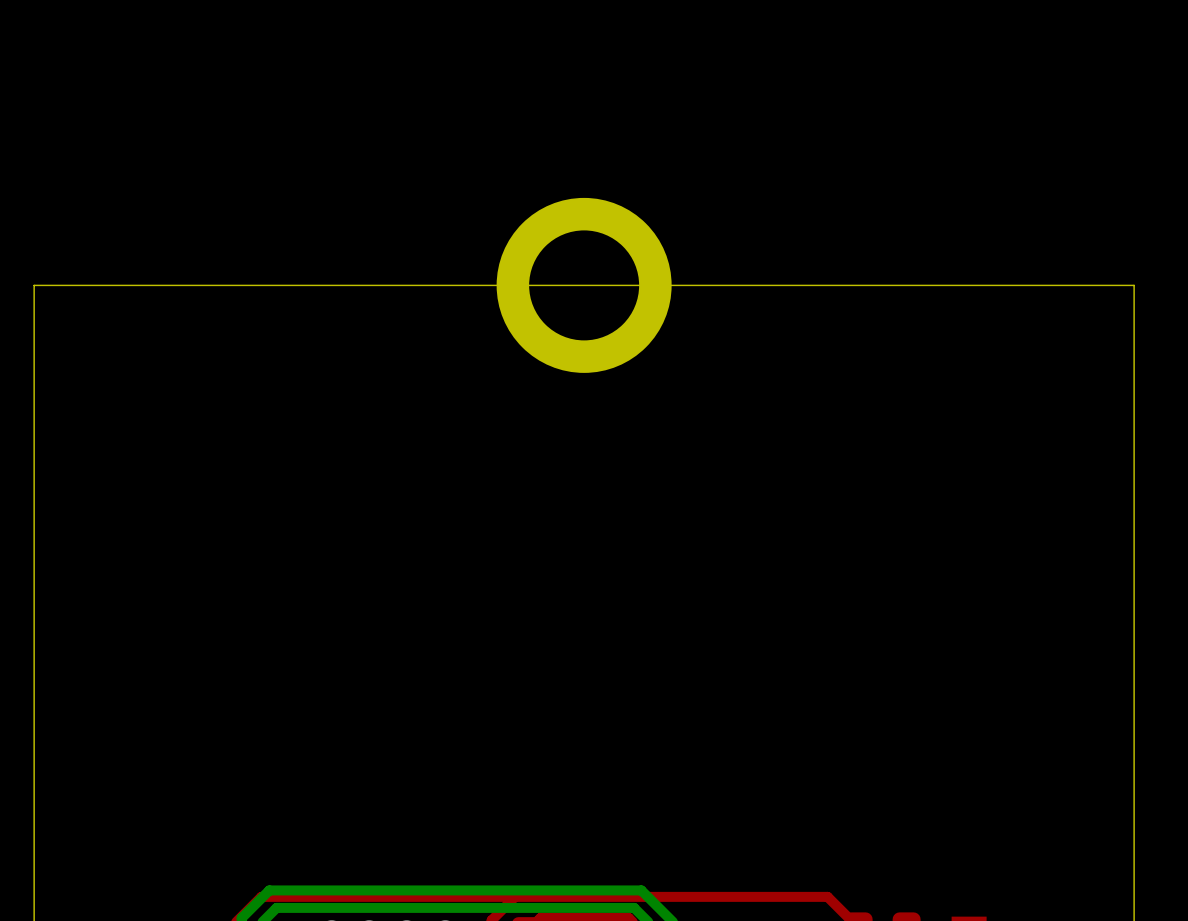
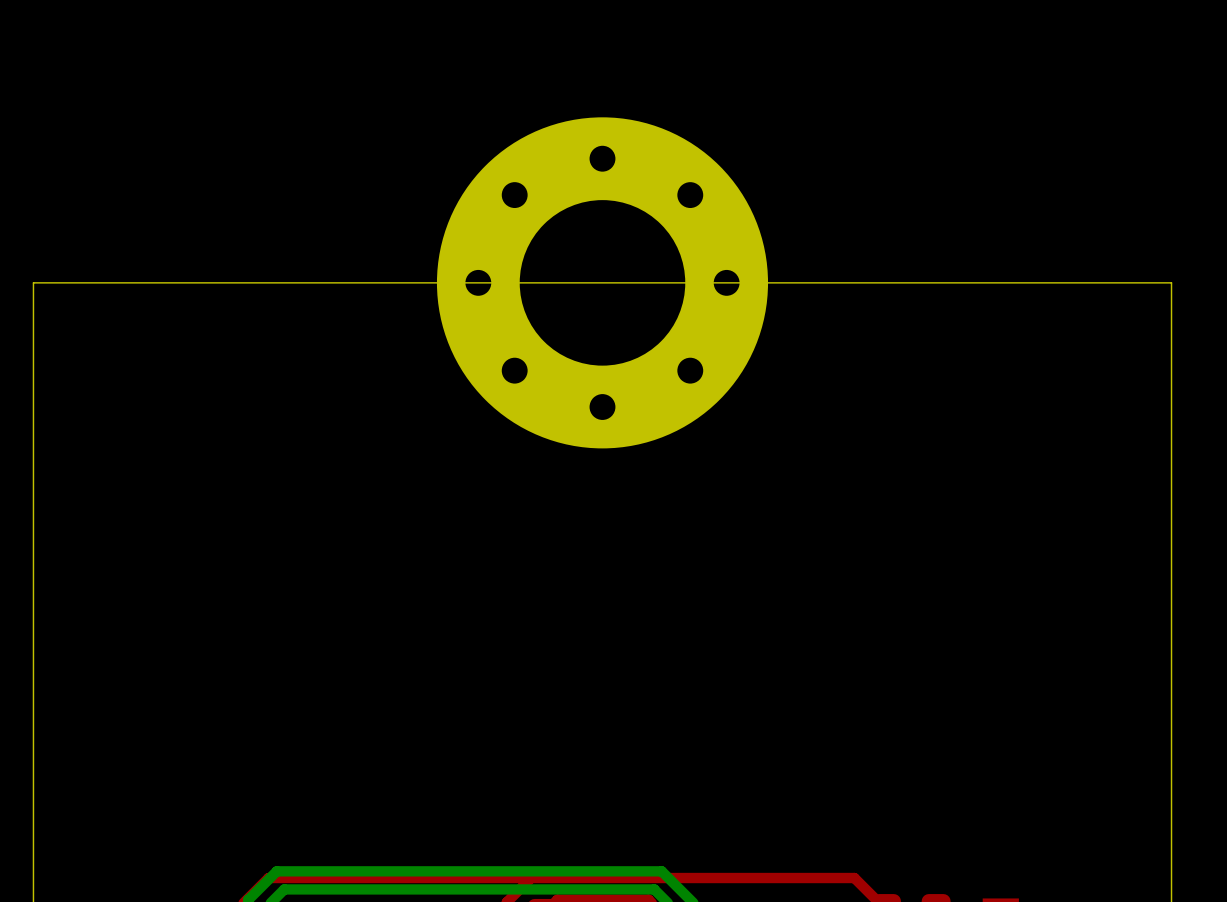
part footprint: [496, 197, 672, 373] -> [436, 117, 769, 449]
board edge: (1134, 321) (1134, 285) (34, 285) (34, 321) -> (1171, 282) (33, 282)

